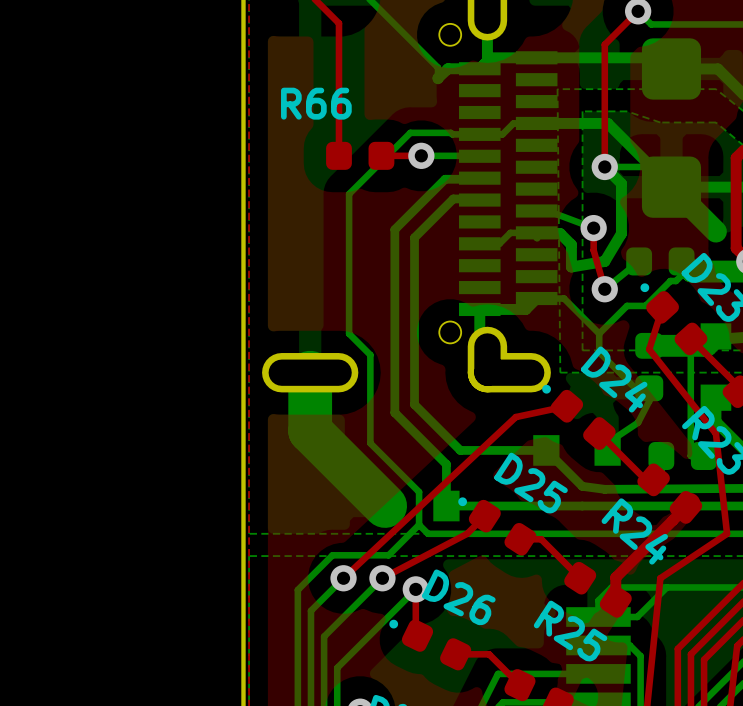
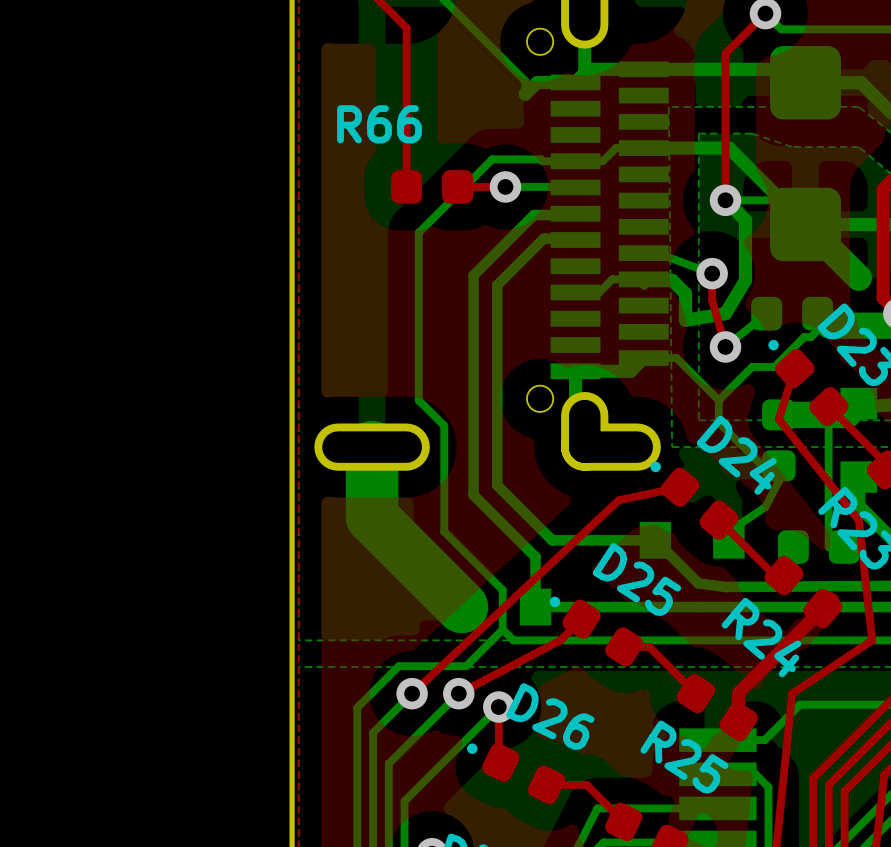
bottom track: (666, 587) (611, 587) (598, 600) (598, 617) -> none

